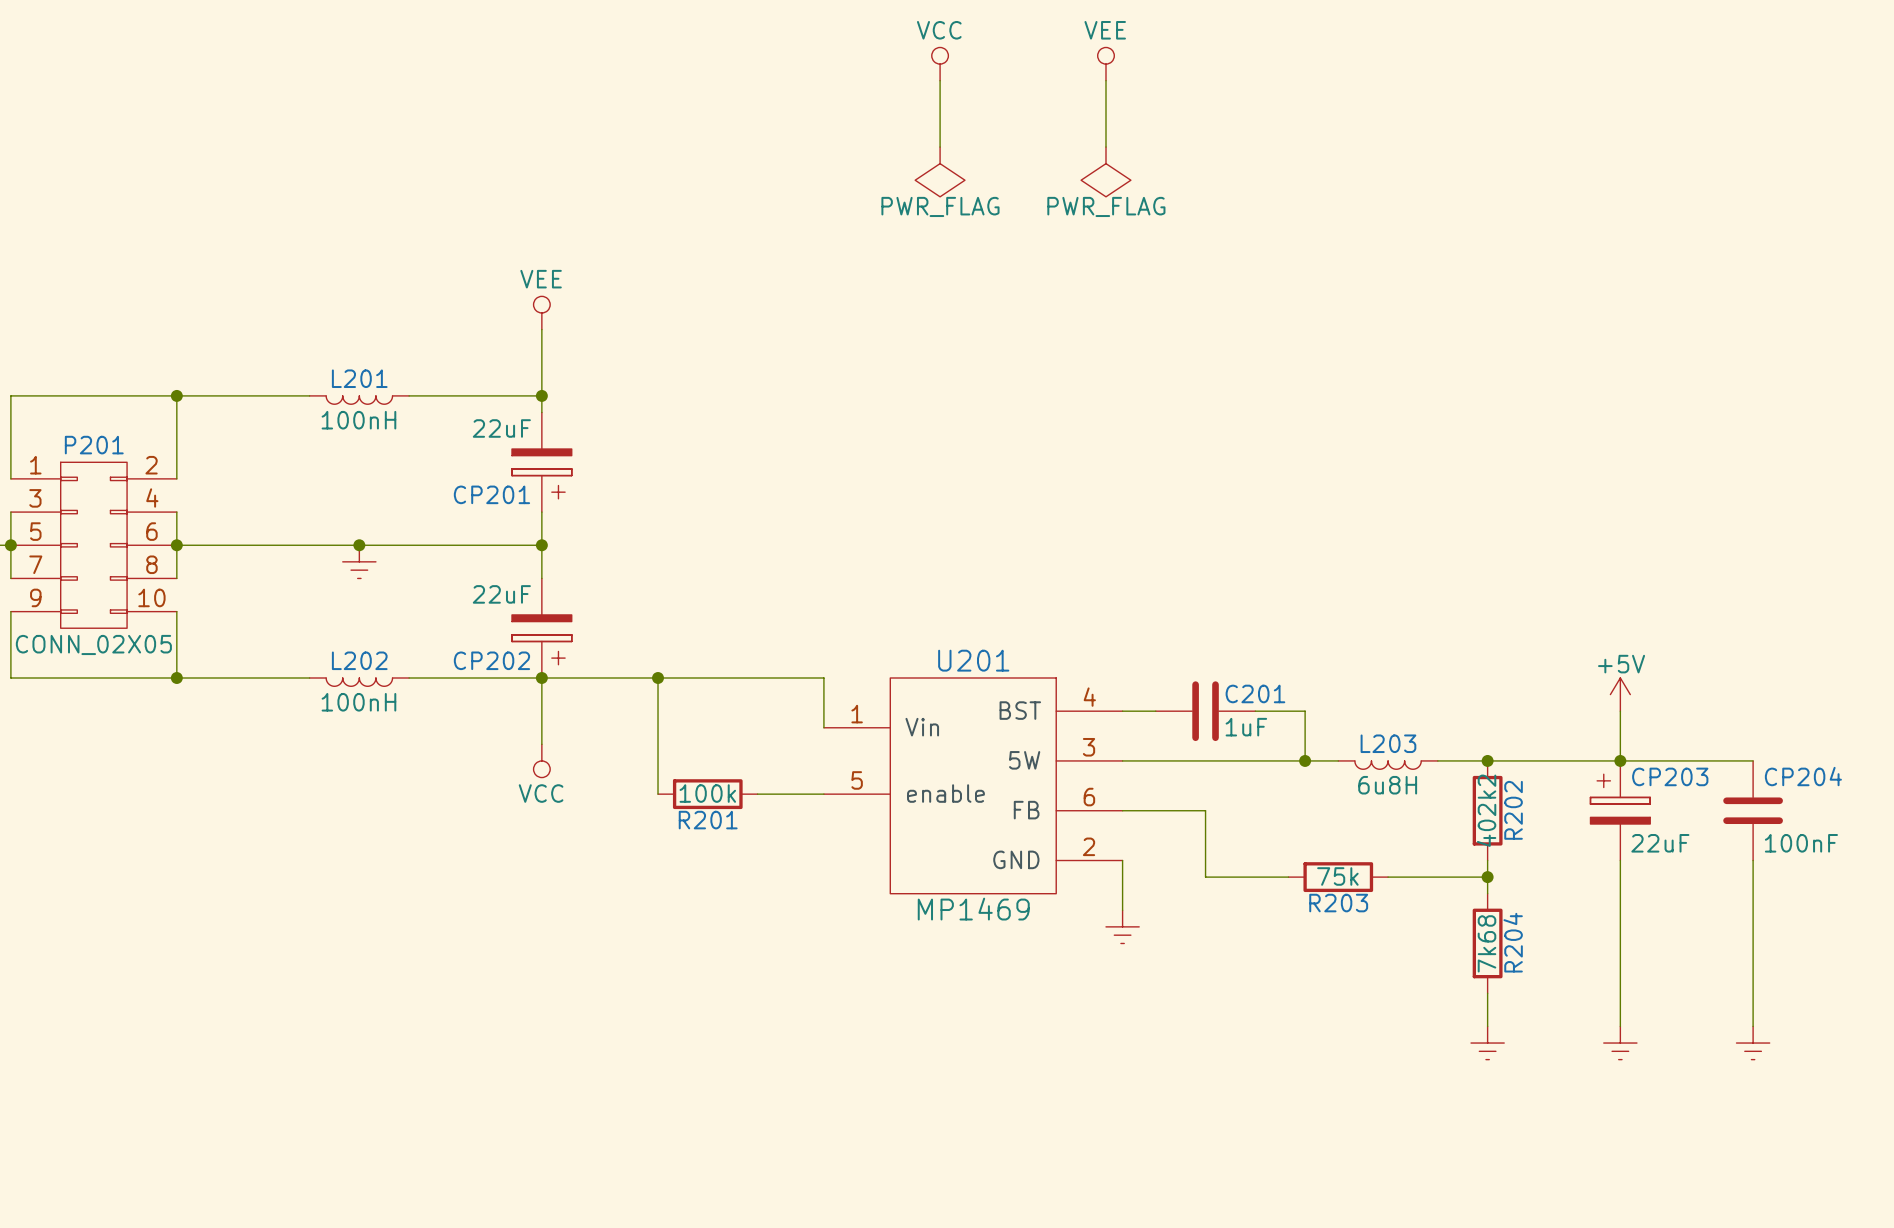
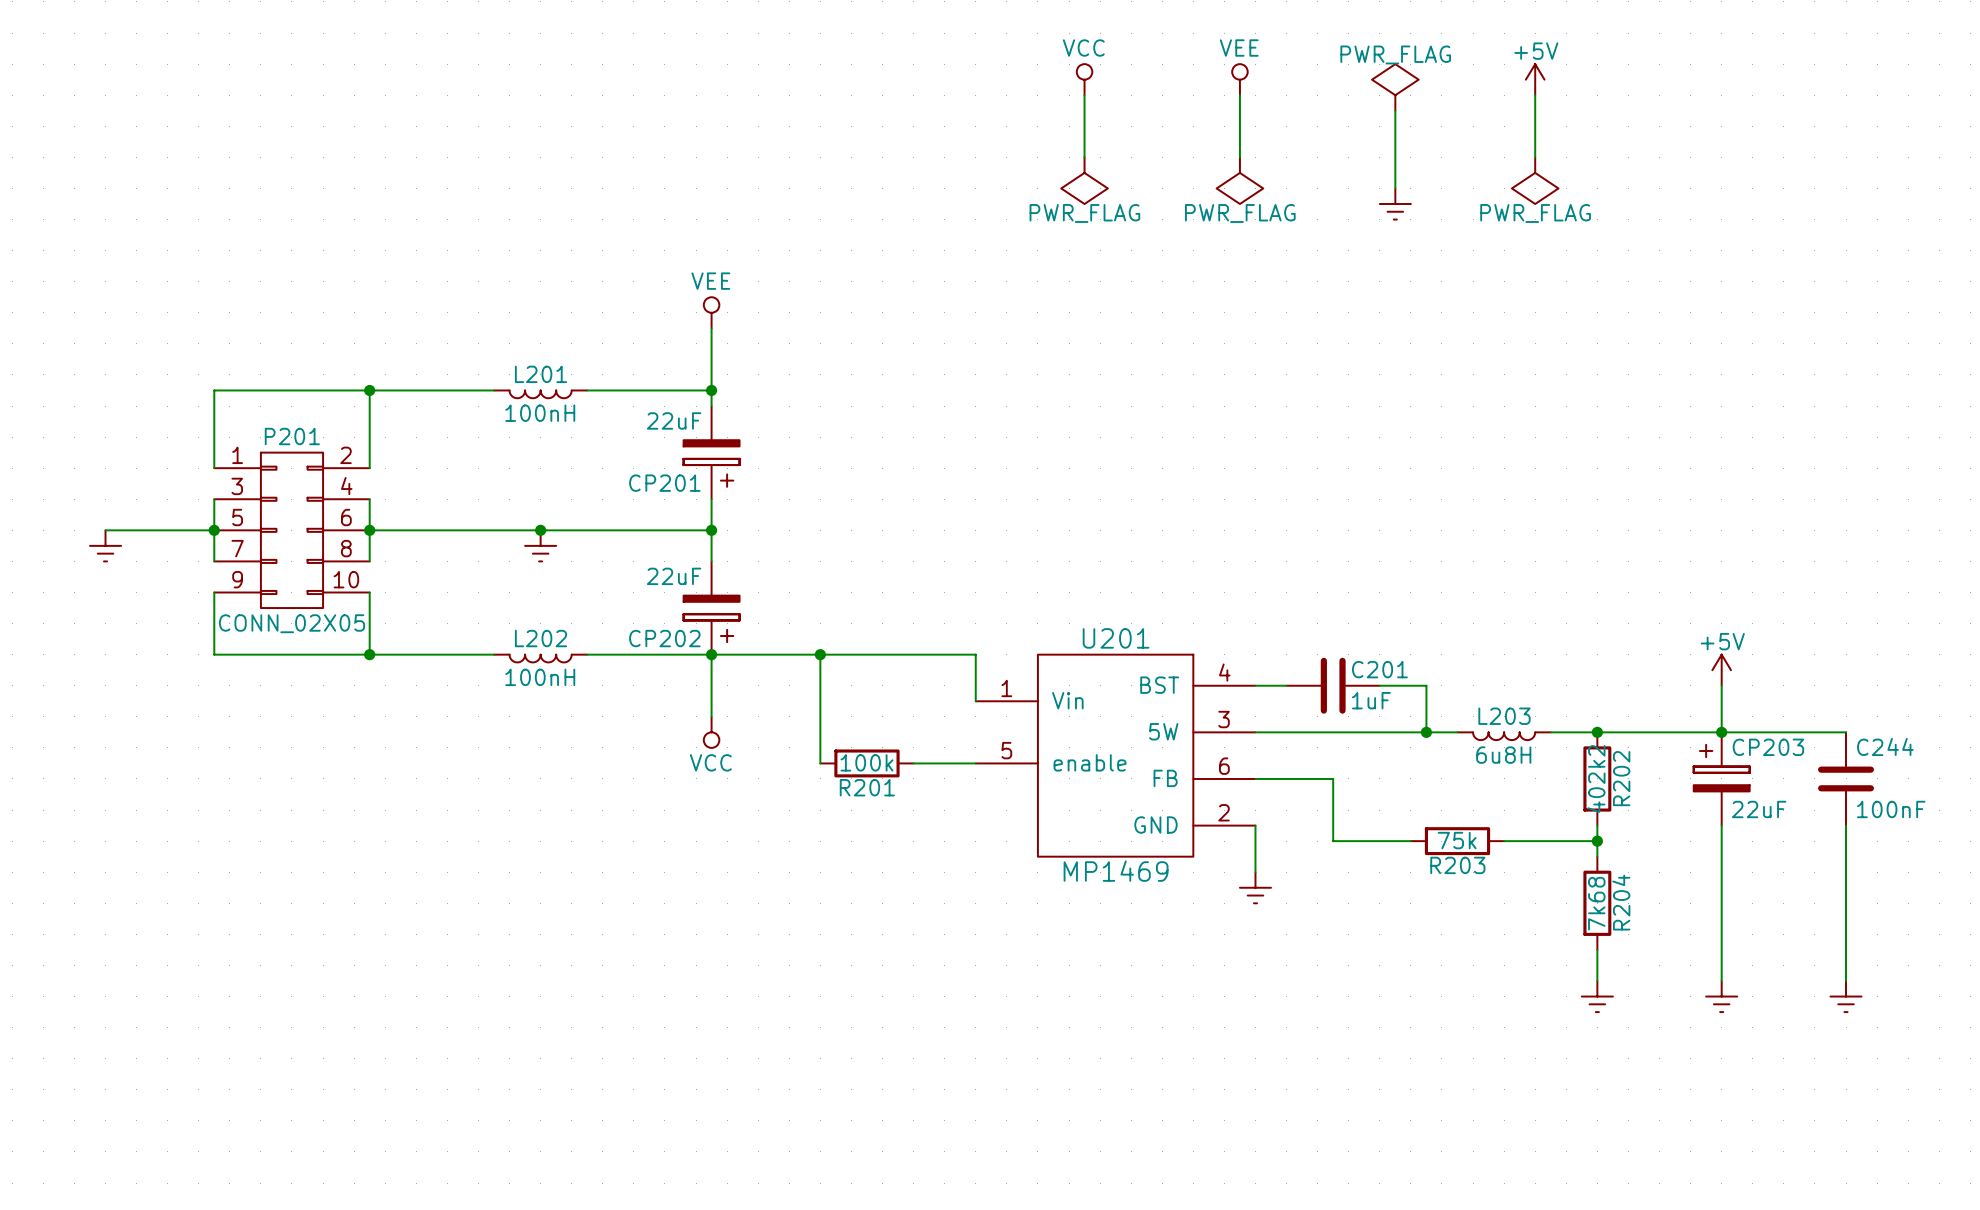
power symbol: none -> +5V (1535, 79)
power symbol: none -> PWR_FLAG (1395, 87)
wire: none -> (1535, 95) (1535, 157)
wire: none -> (1395, 110) (1395, 188)
power symbol: none -> PWR_FLAG (1535, 180)
power symbol: none -> (1395, 203)
CP204 name: CP204 (1803, 776) -> C244 (1885, 746)

